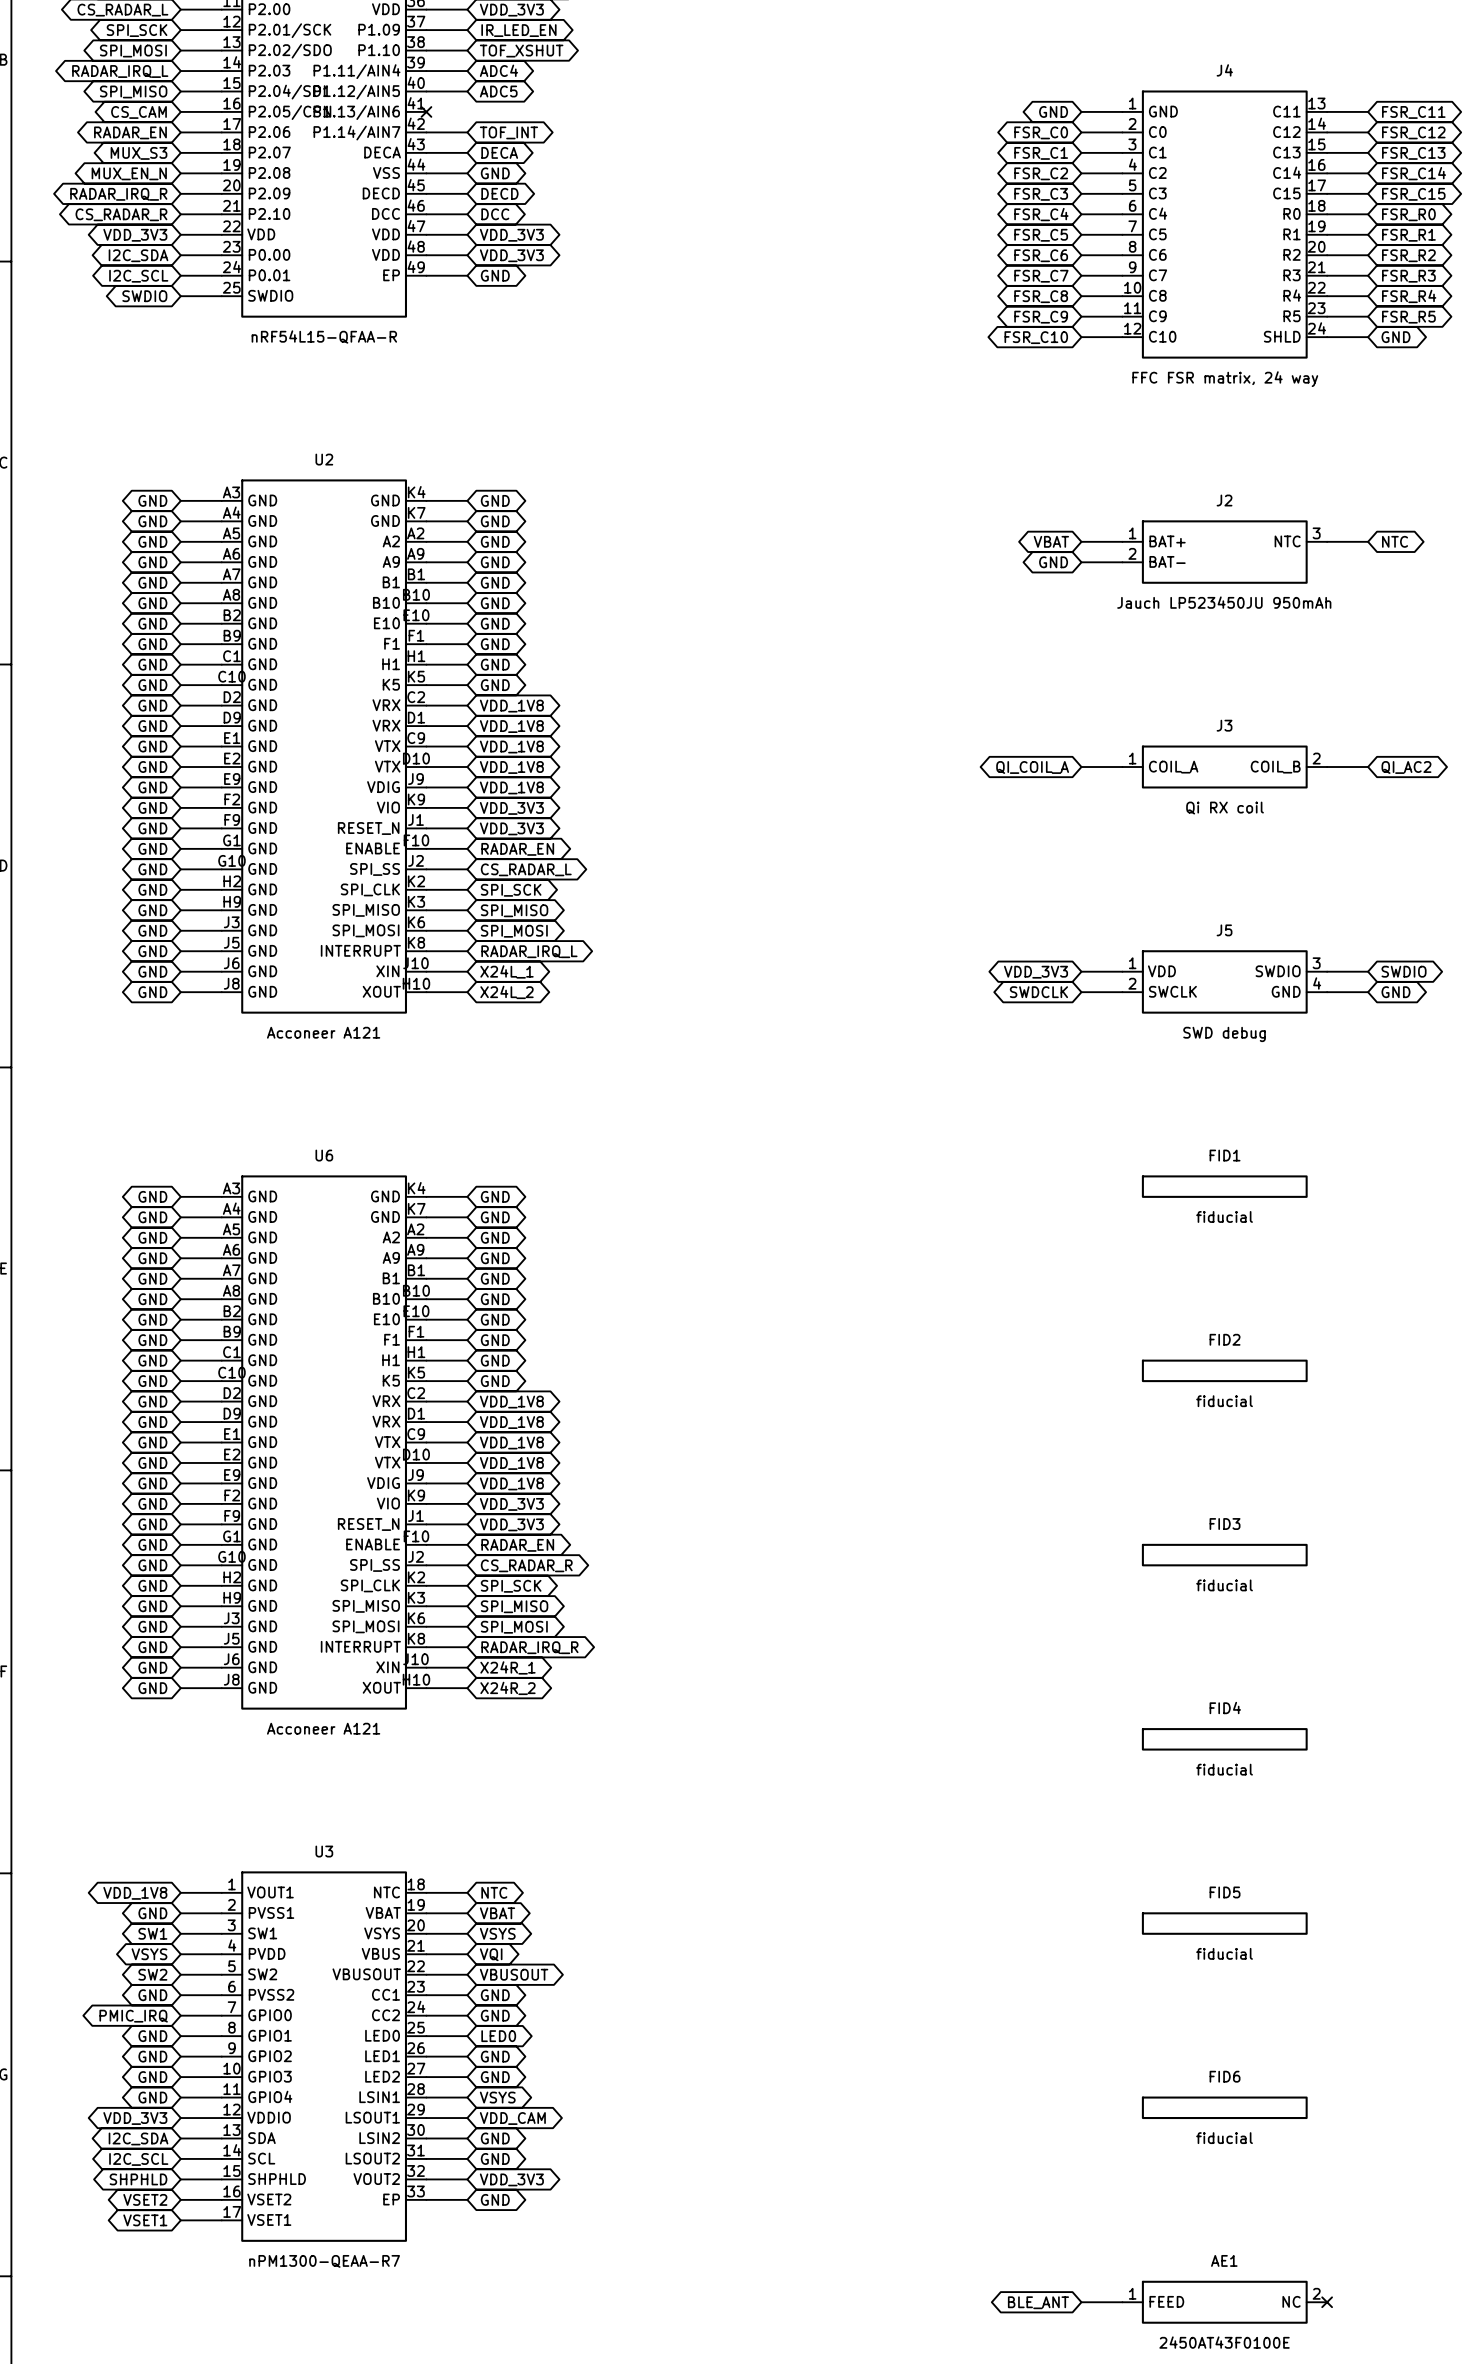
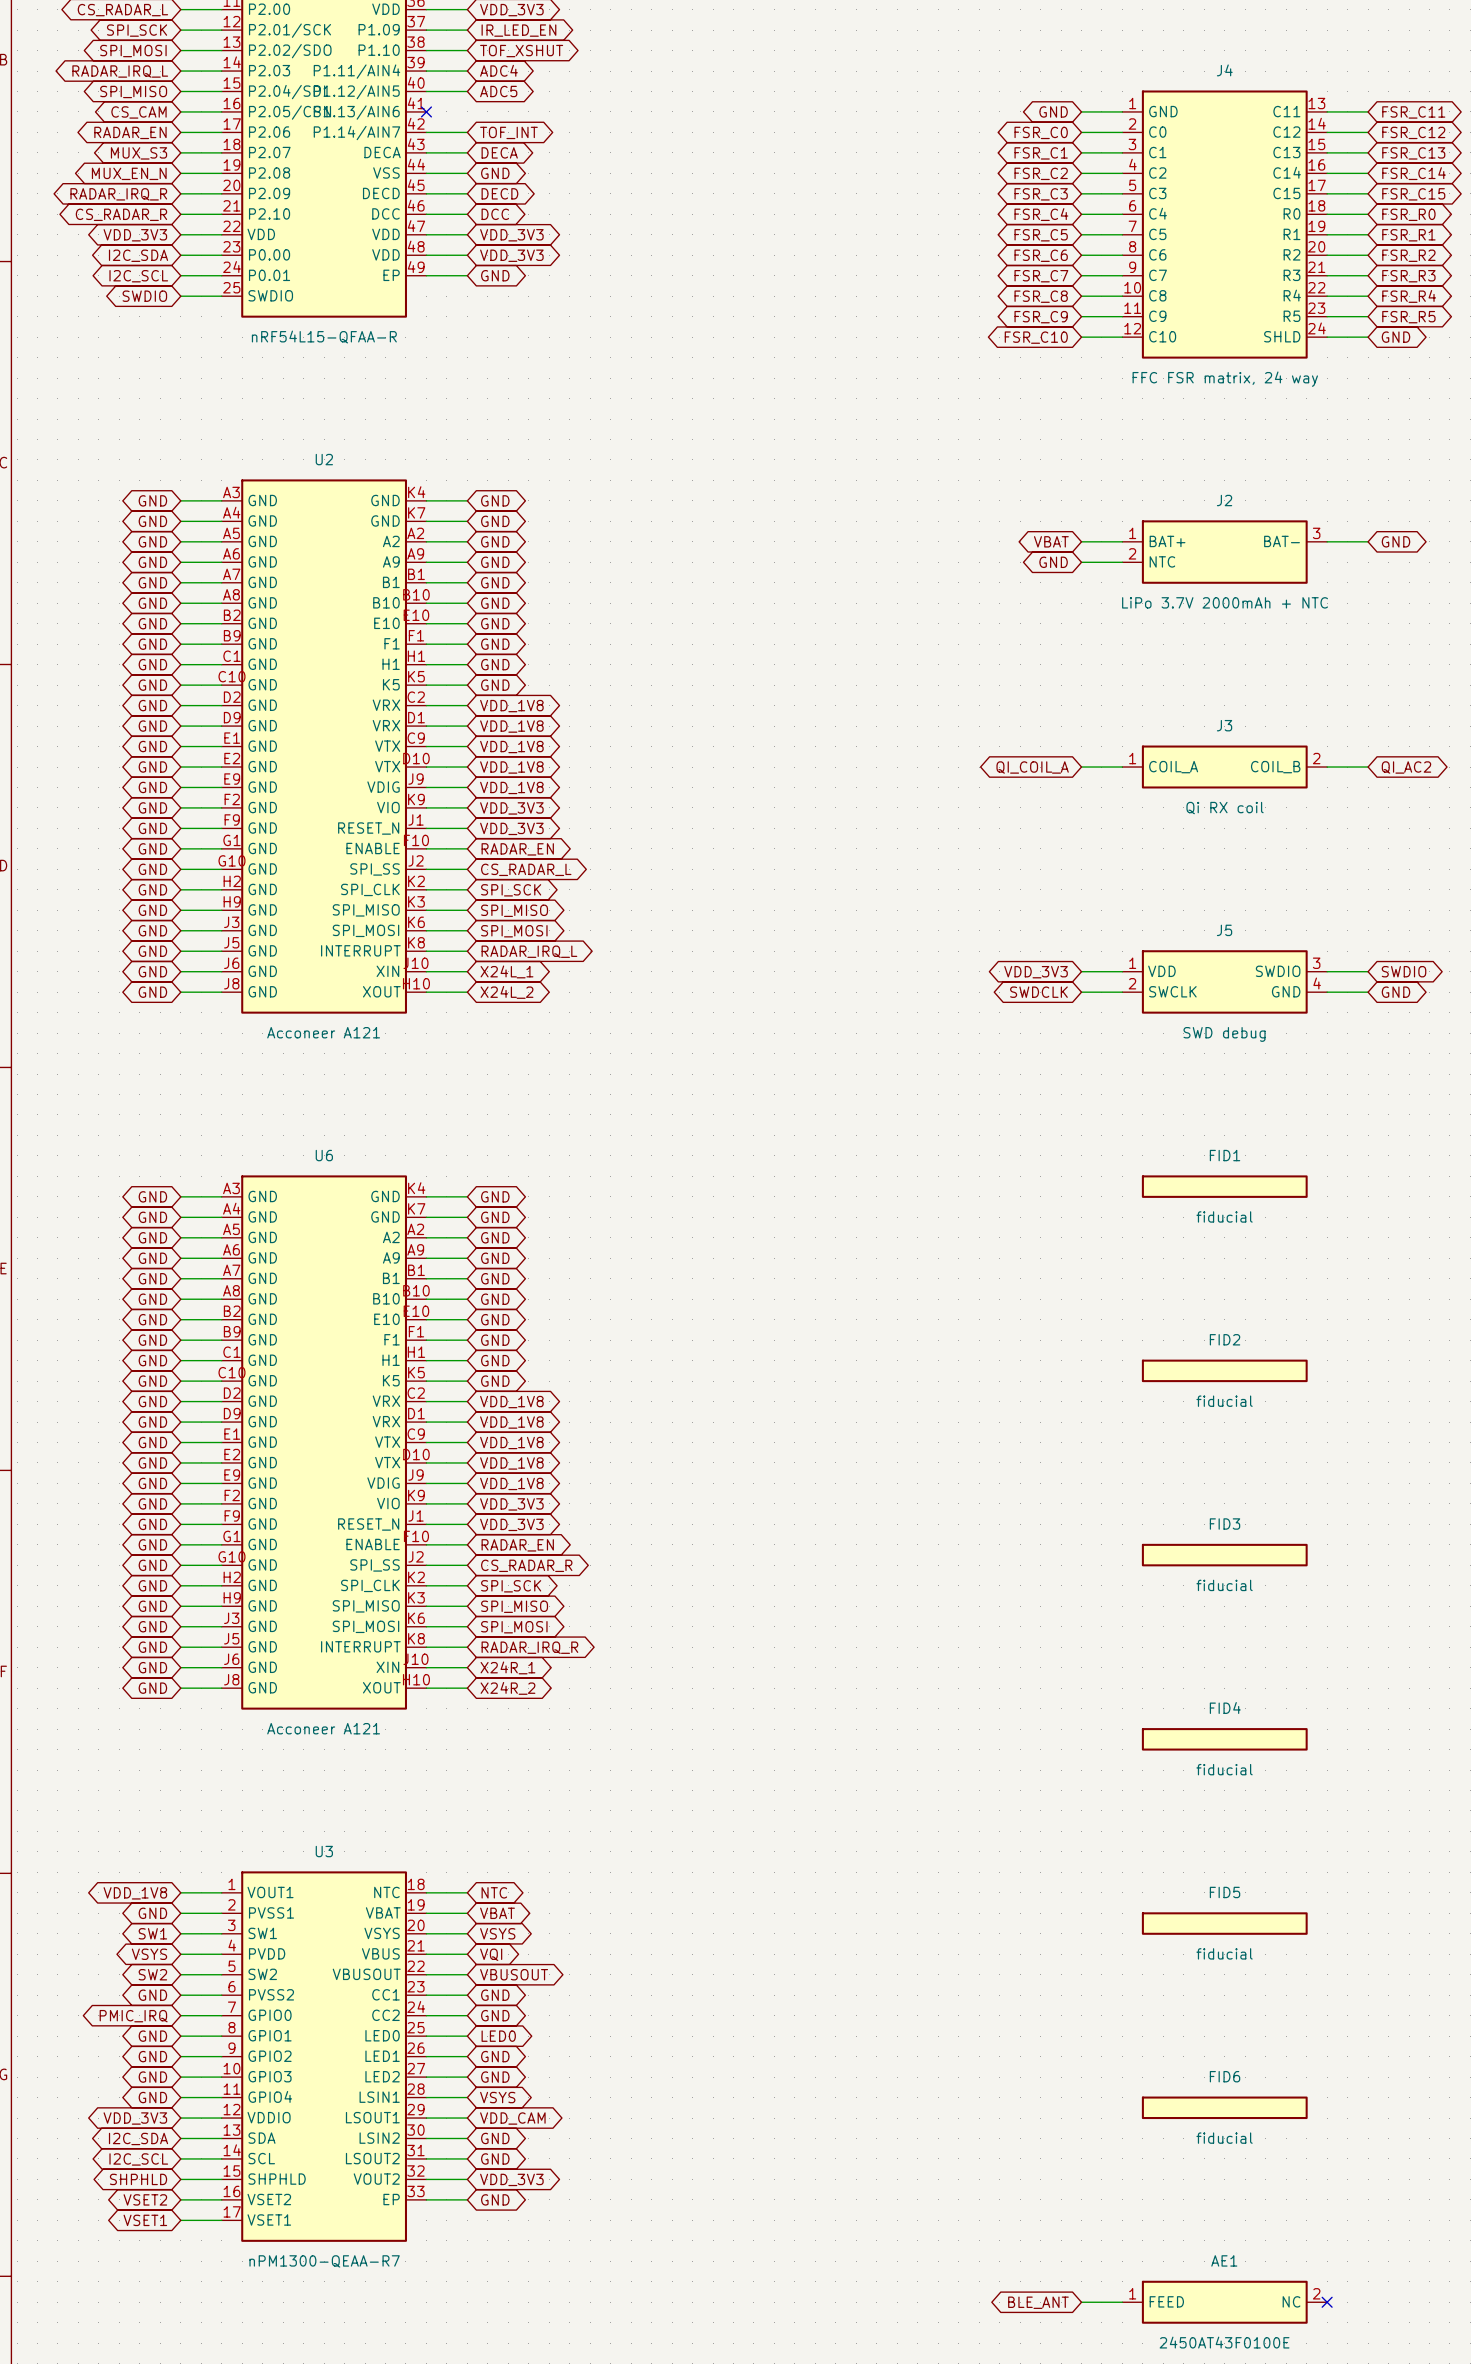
J2 pin name: NTC (1287, 541) -> BAT- (1282, 541)
global label: NTC (1395, 541) -> GND (1395, 541)
J2 pin name: BAT- (1167, 561) -> NTC (1162, 561)
J2 value: Jauch LP523450JU 950mAh (1224, 602) -> LiPo 3.7V 2000mAh + NTC (1225, 602)

